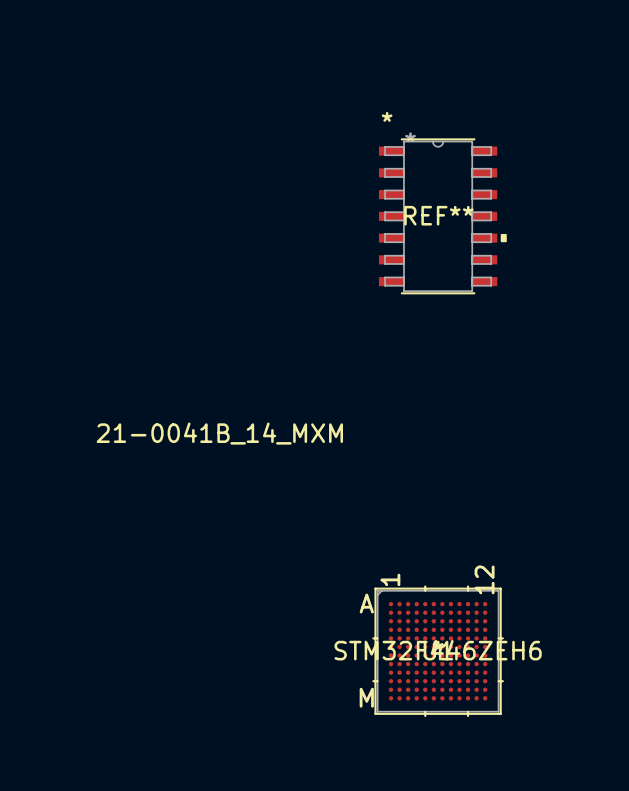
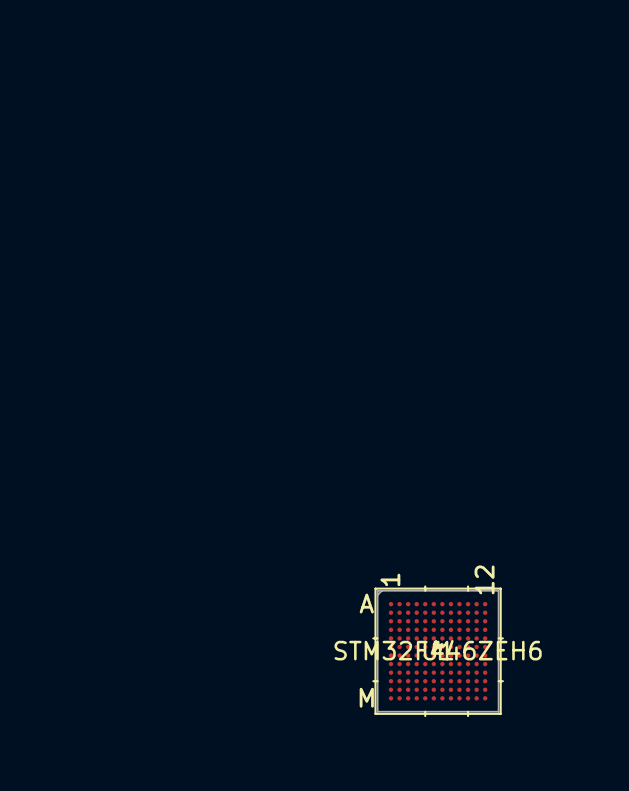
REF**: 21-0041B_14_MXM (442, 216) -> none

